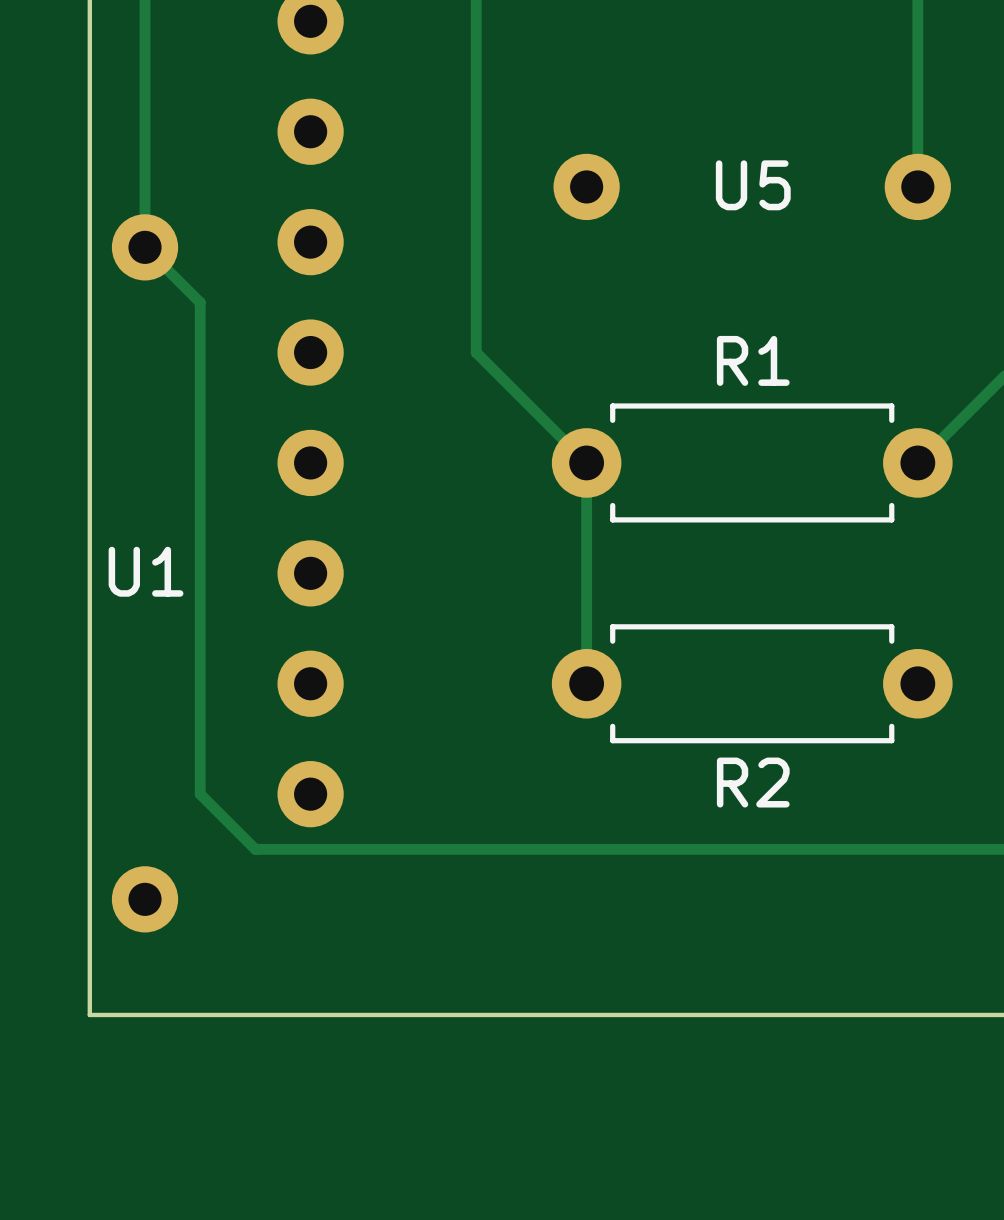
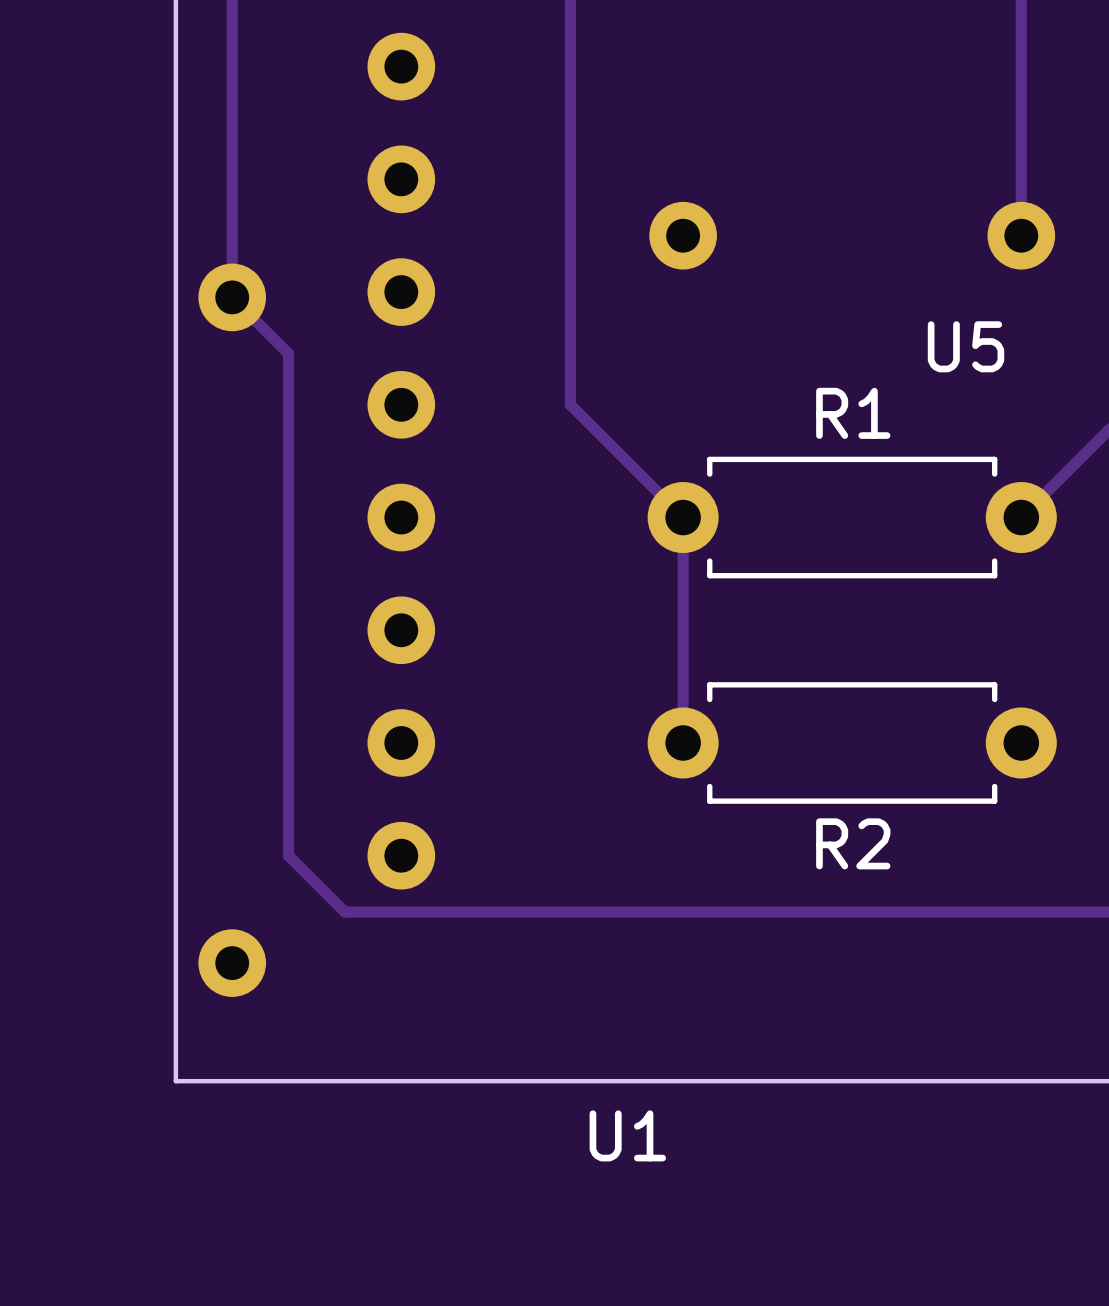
U5 name position: U5 (753, 185) -> U5 (966, 346)
U1 name position: U1 (146, 571) -> U1 (627, 1135)

